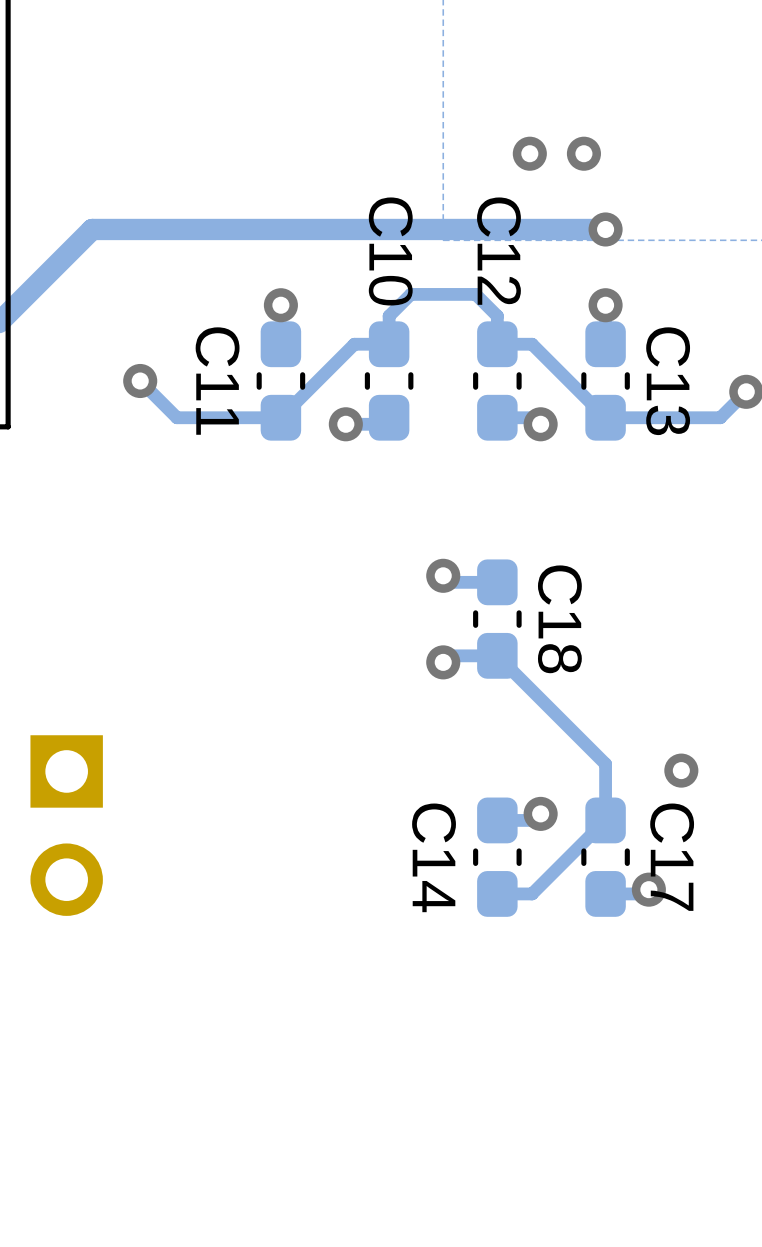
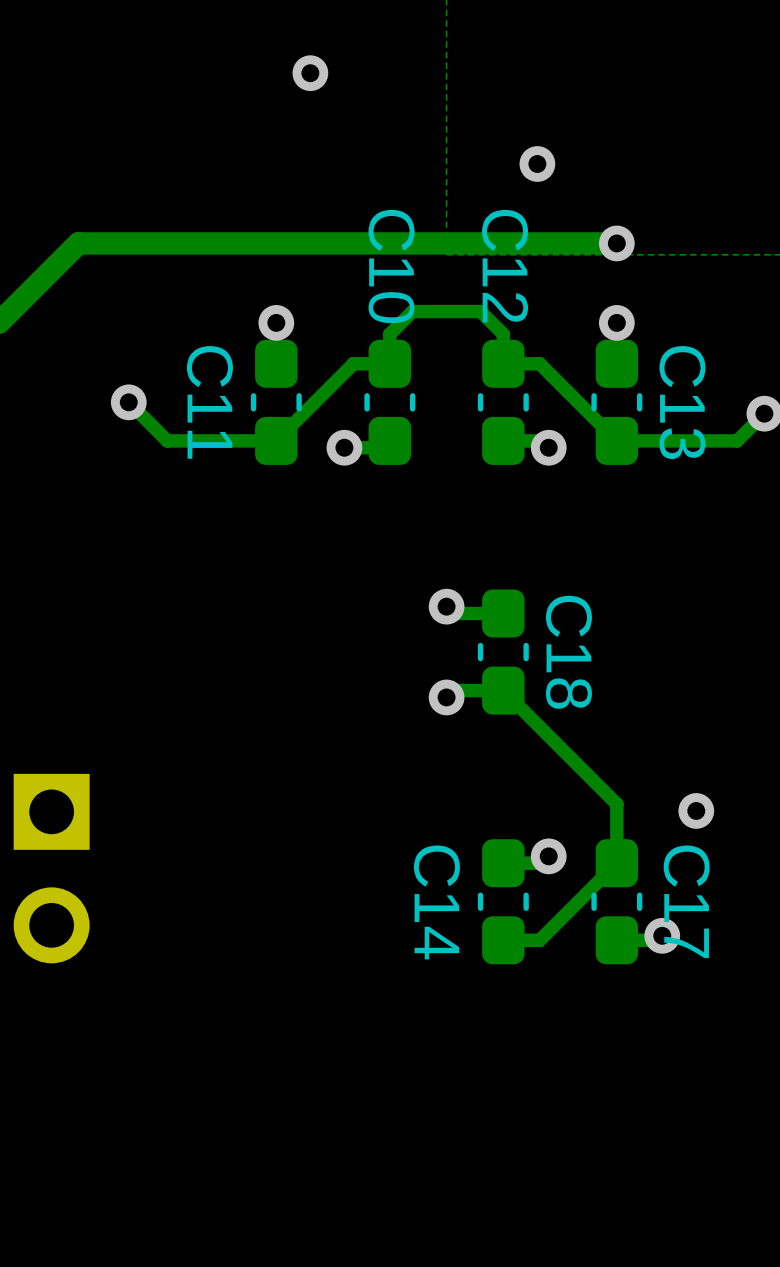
via: none -> (310, 73)
via: (583, 153) -> none

